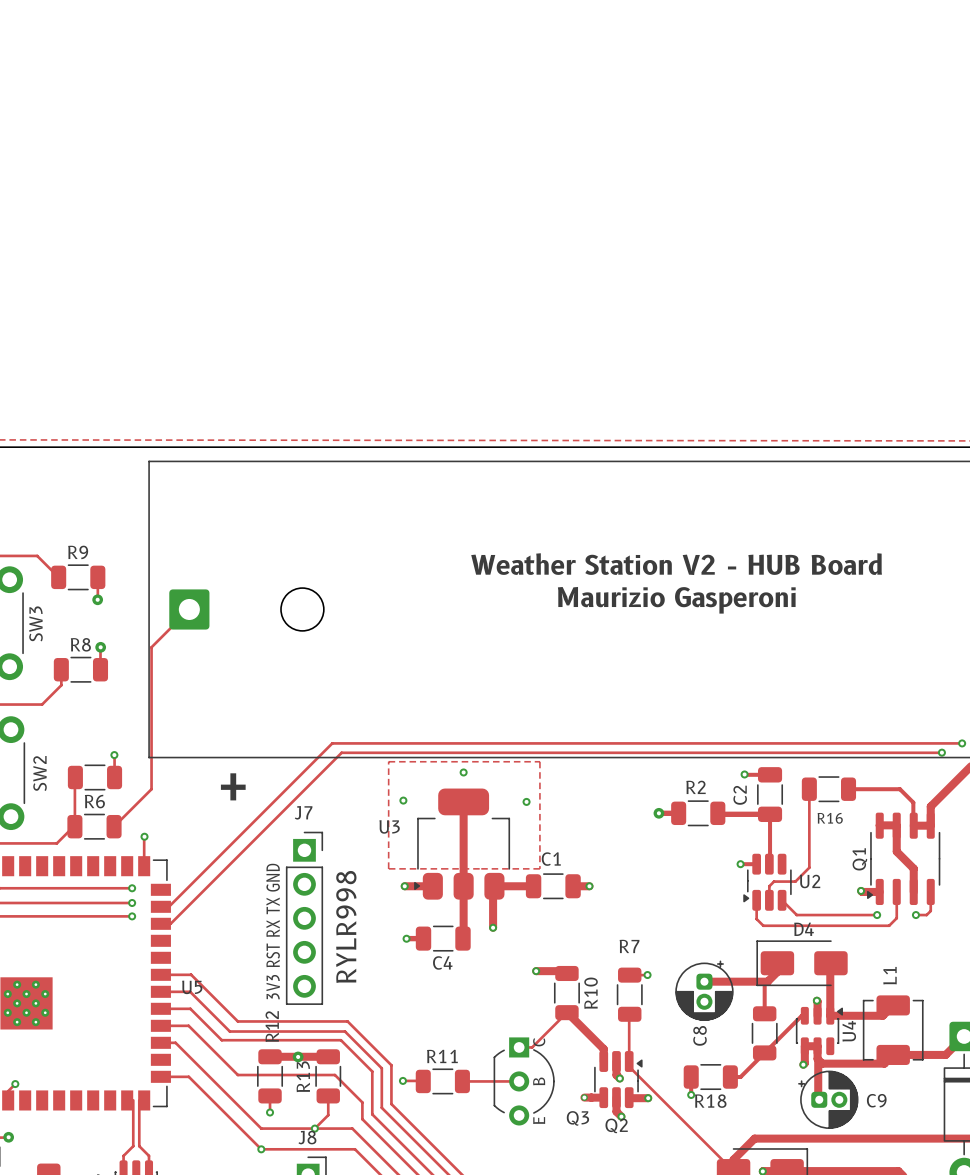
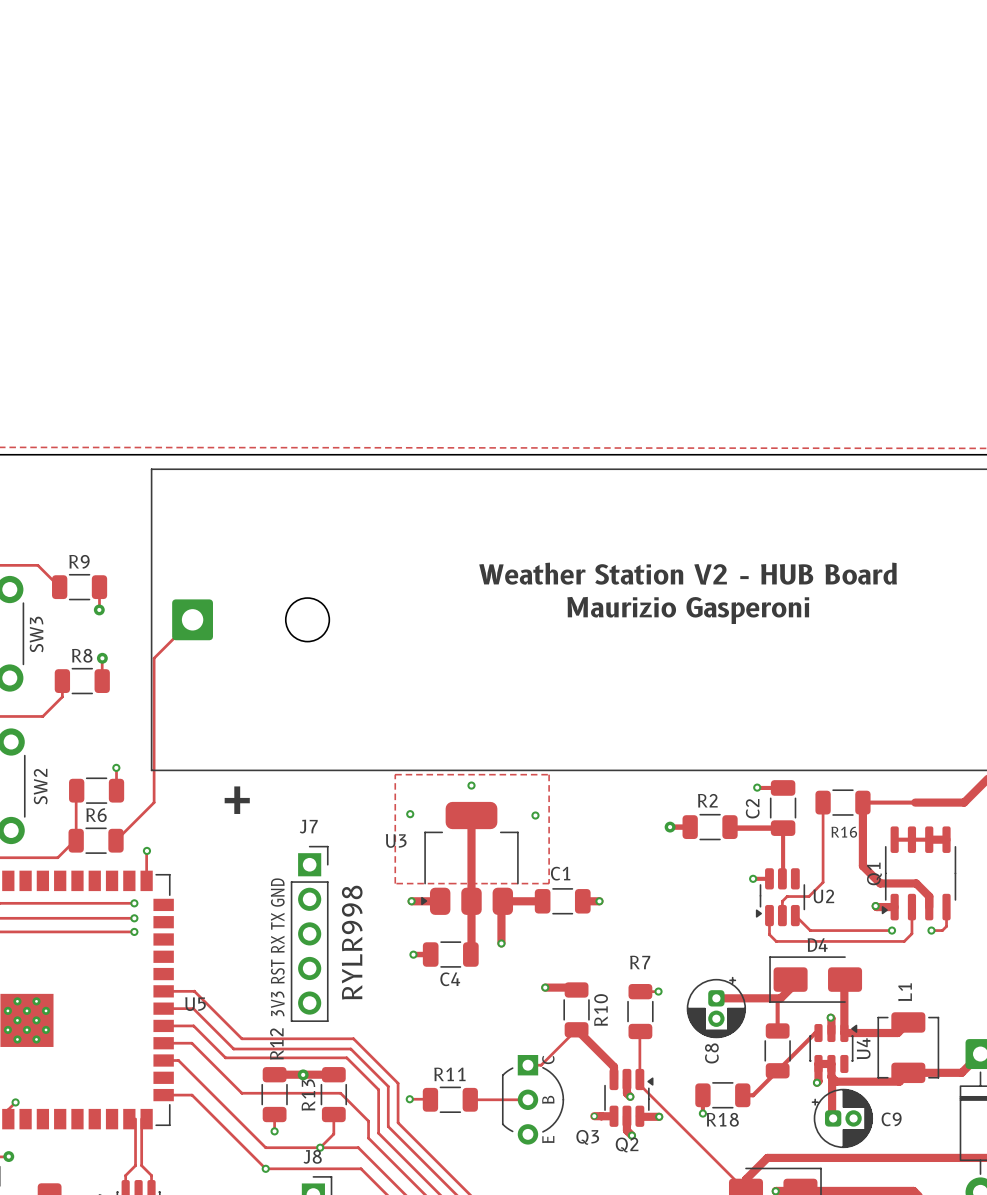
track: (962, 743) (332, 743) (168, 906) (160, 906) -> none
via: (962, 743) -> none
track: (941, 752) (341, 752) (170, 923) (160, 923) -> none
via: (941, 752) -> none
track: (899, 789) (913, 802) (913, 825) -> none
track: (948, 789) (930, 806) (930, 825) -> (964, 802) (915, 802)
track: (879, 825) (896, 825) (896, 851) (913, 868) (913, 881) -> (862, 802) (862, 866) (880, 883) (916, 883) (929, 896)
track: none -> (894, 839) (929, 839)

